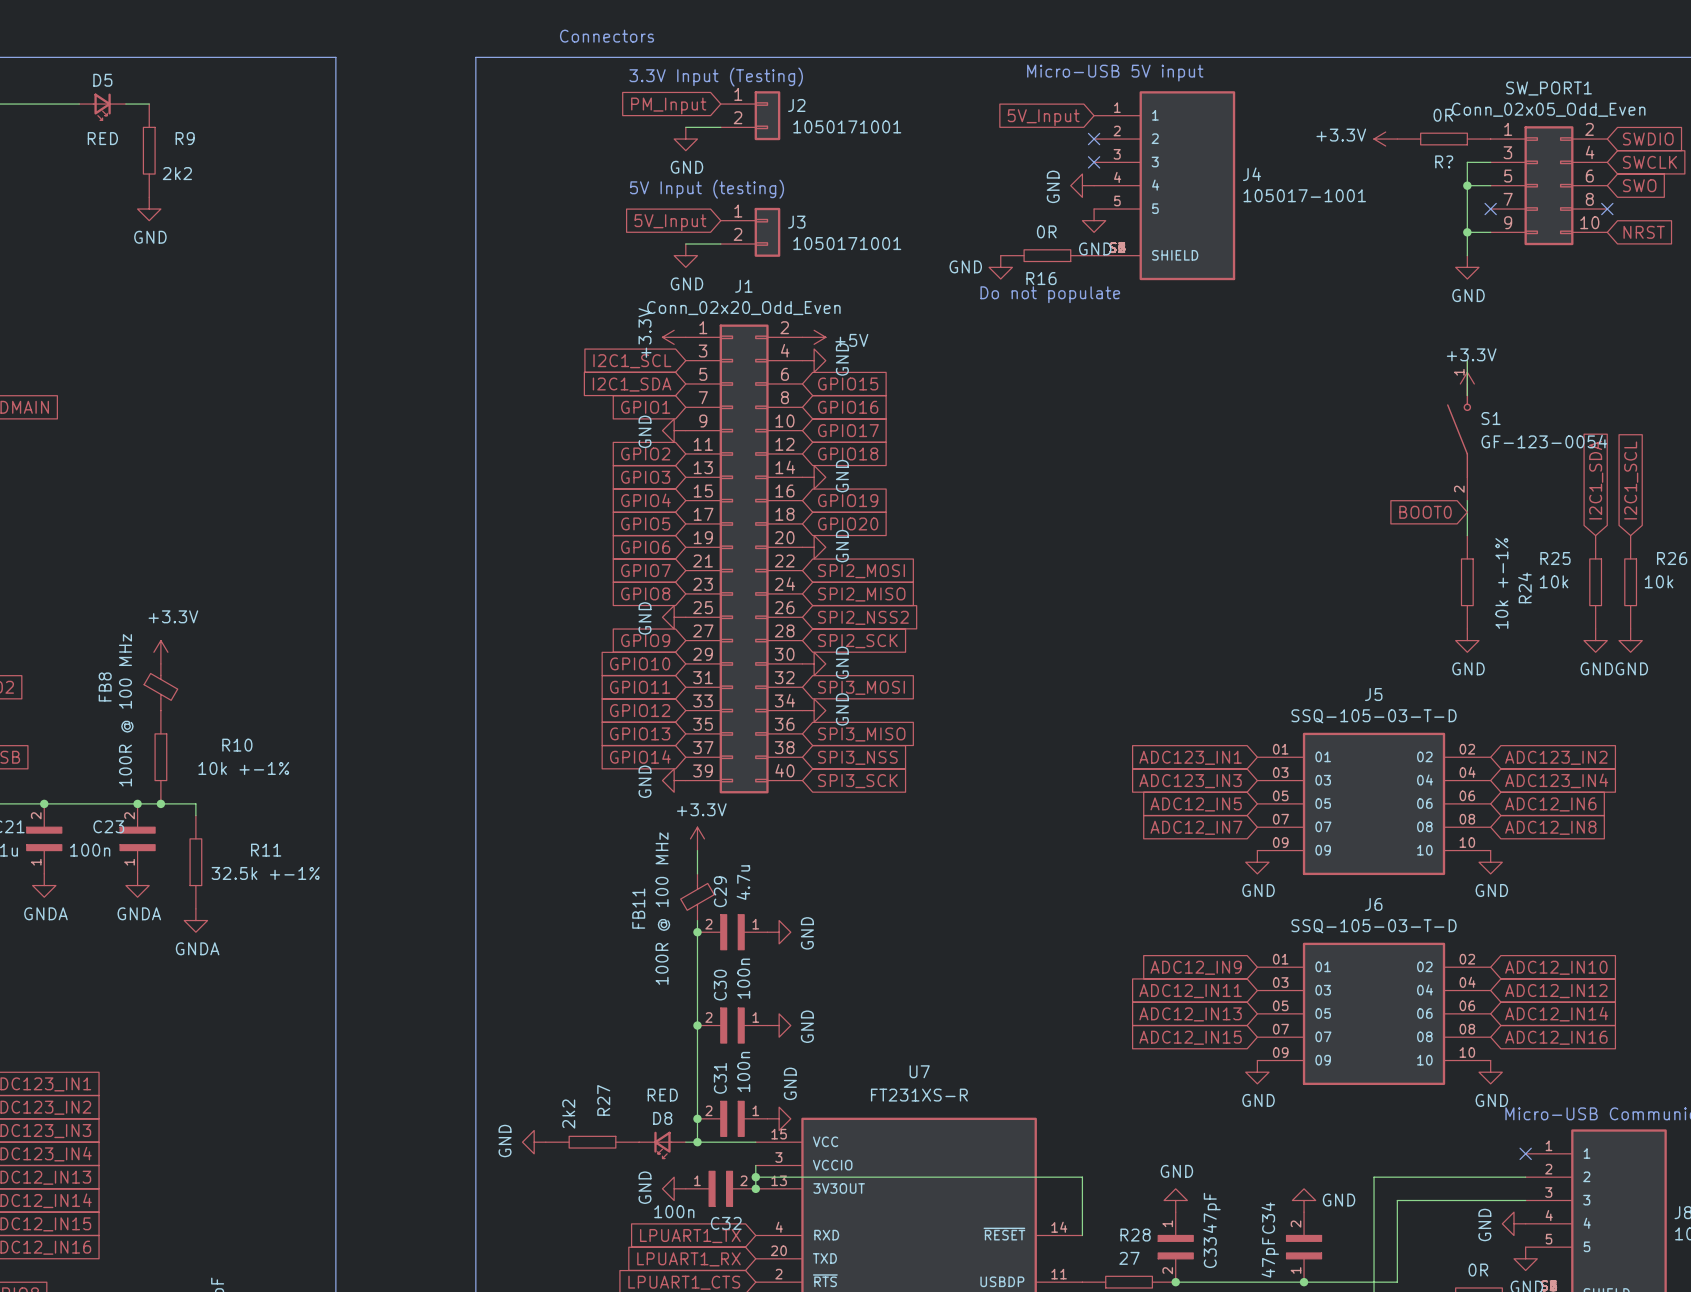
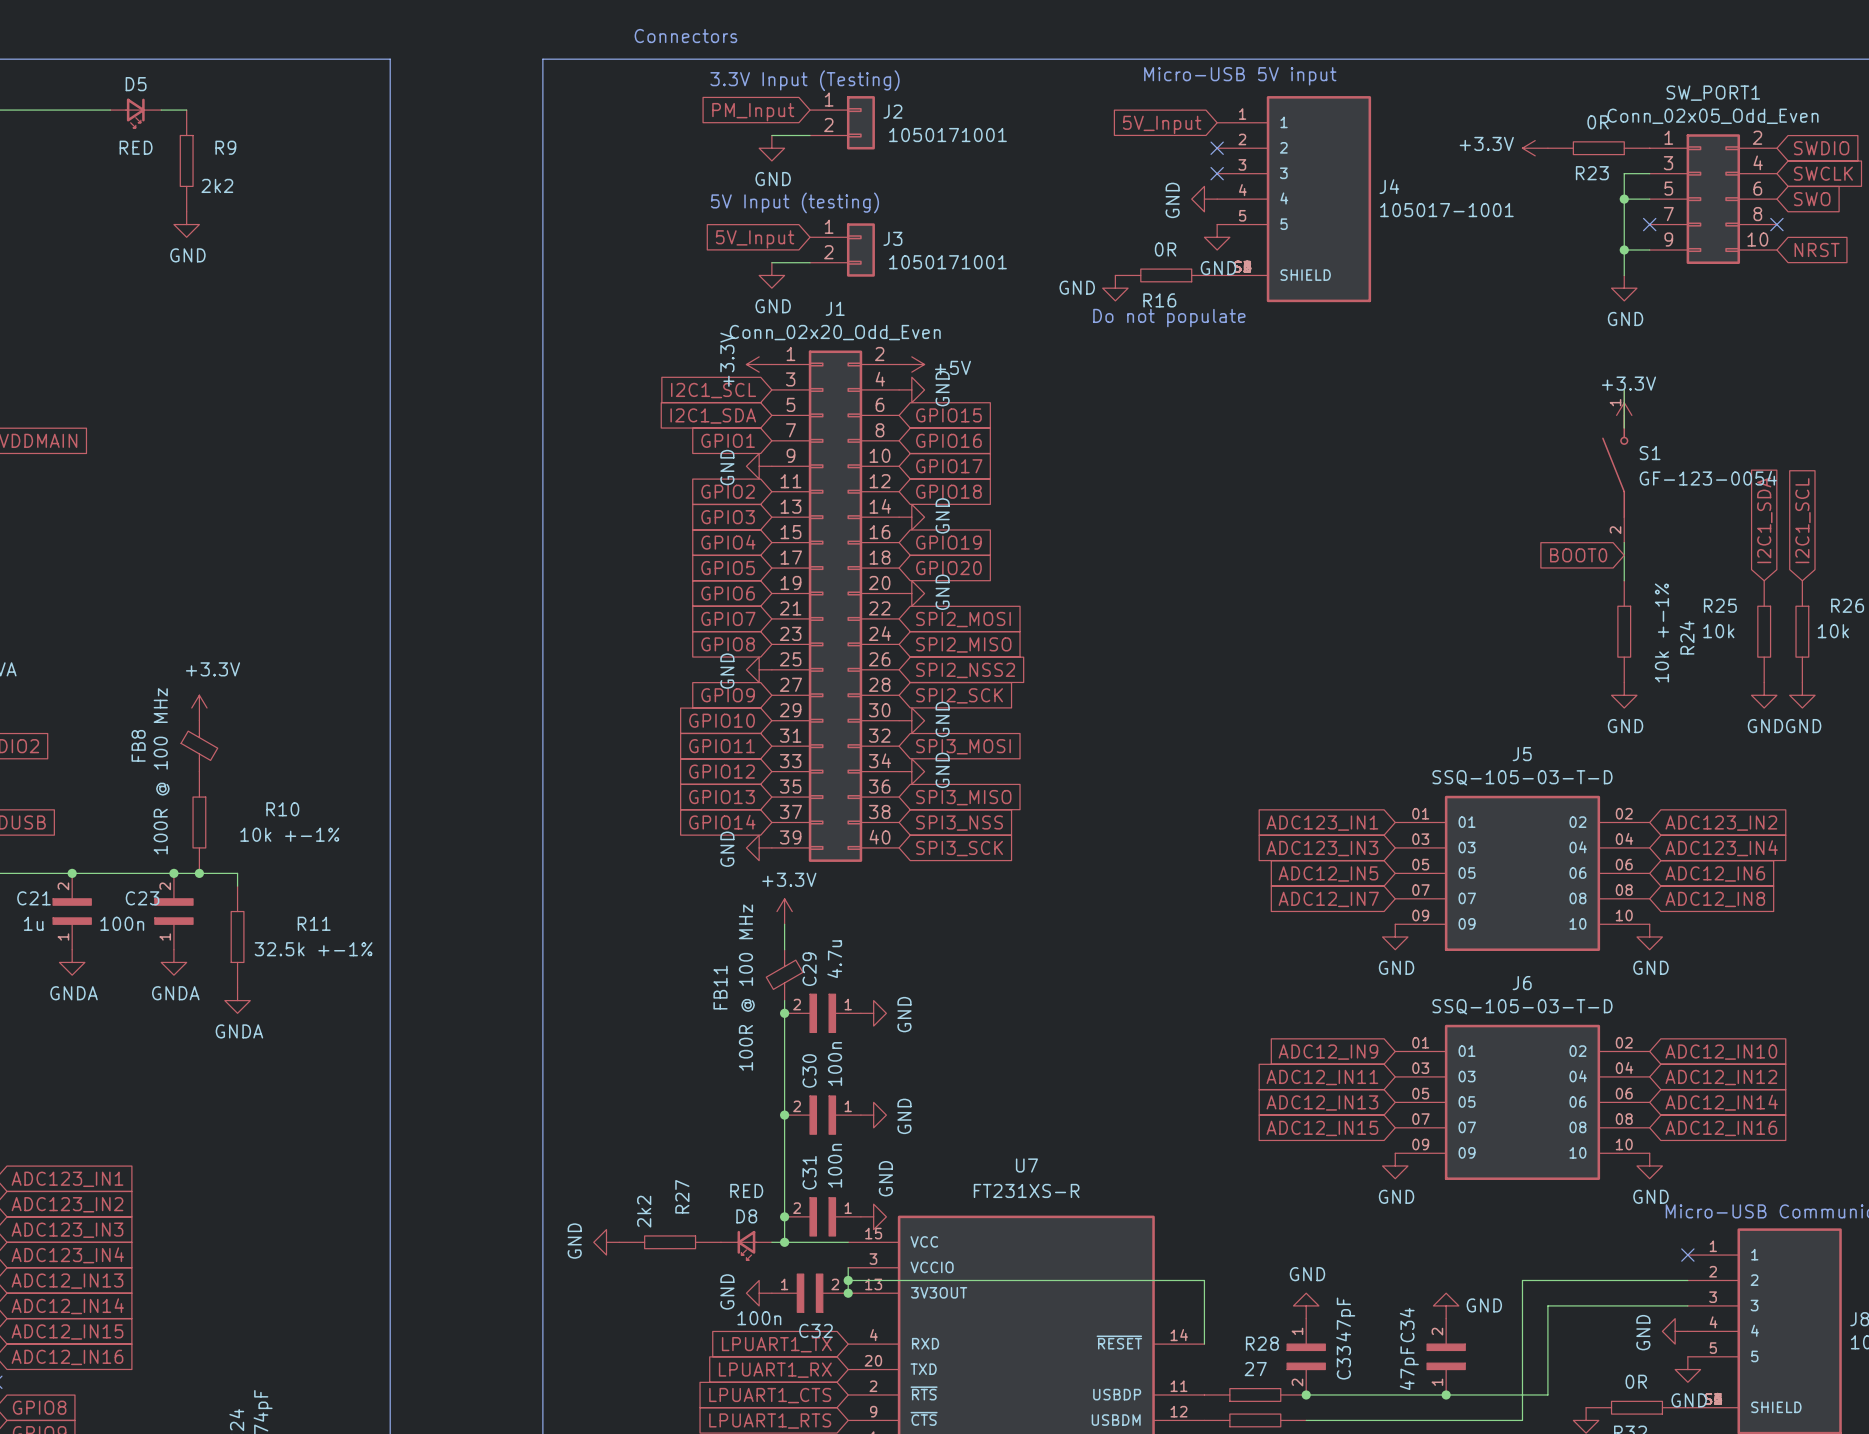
R? name: R? (1444, 161) -> R23 (1592, 173)

